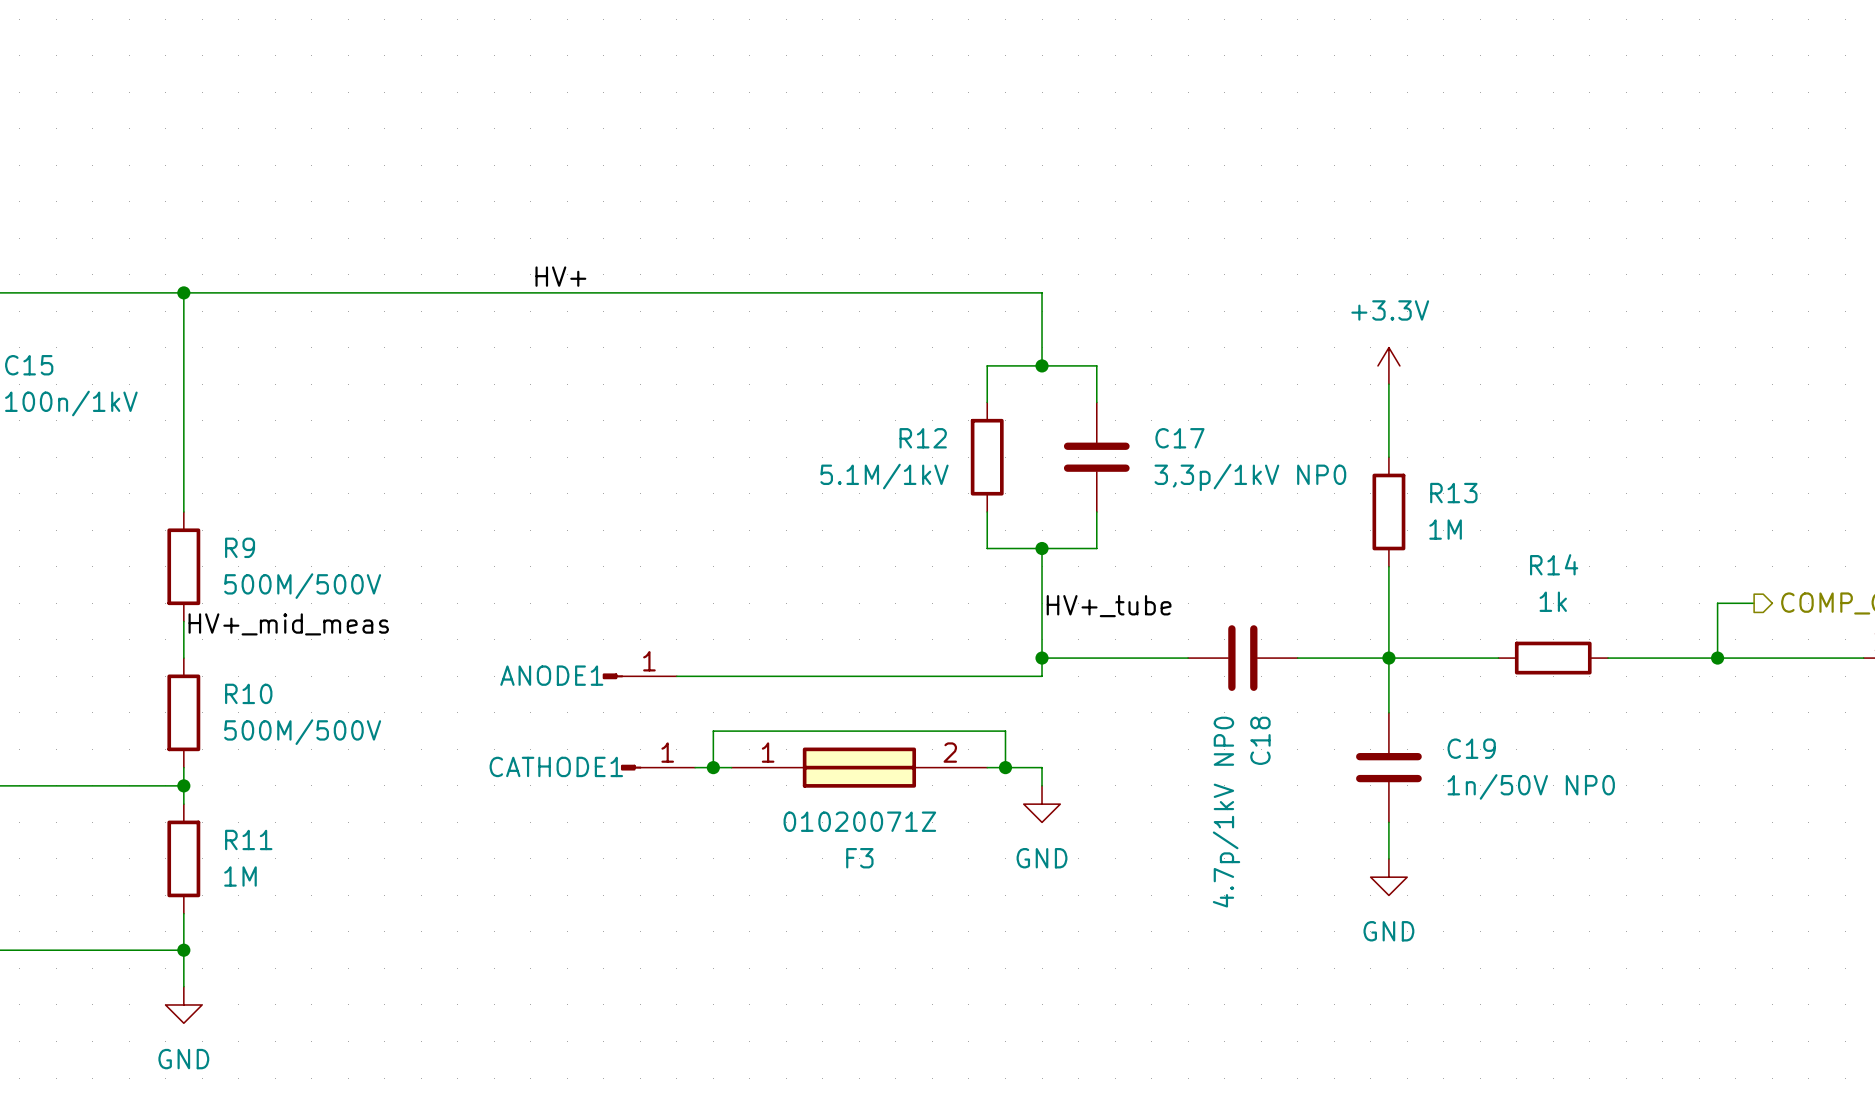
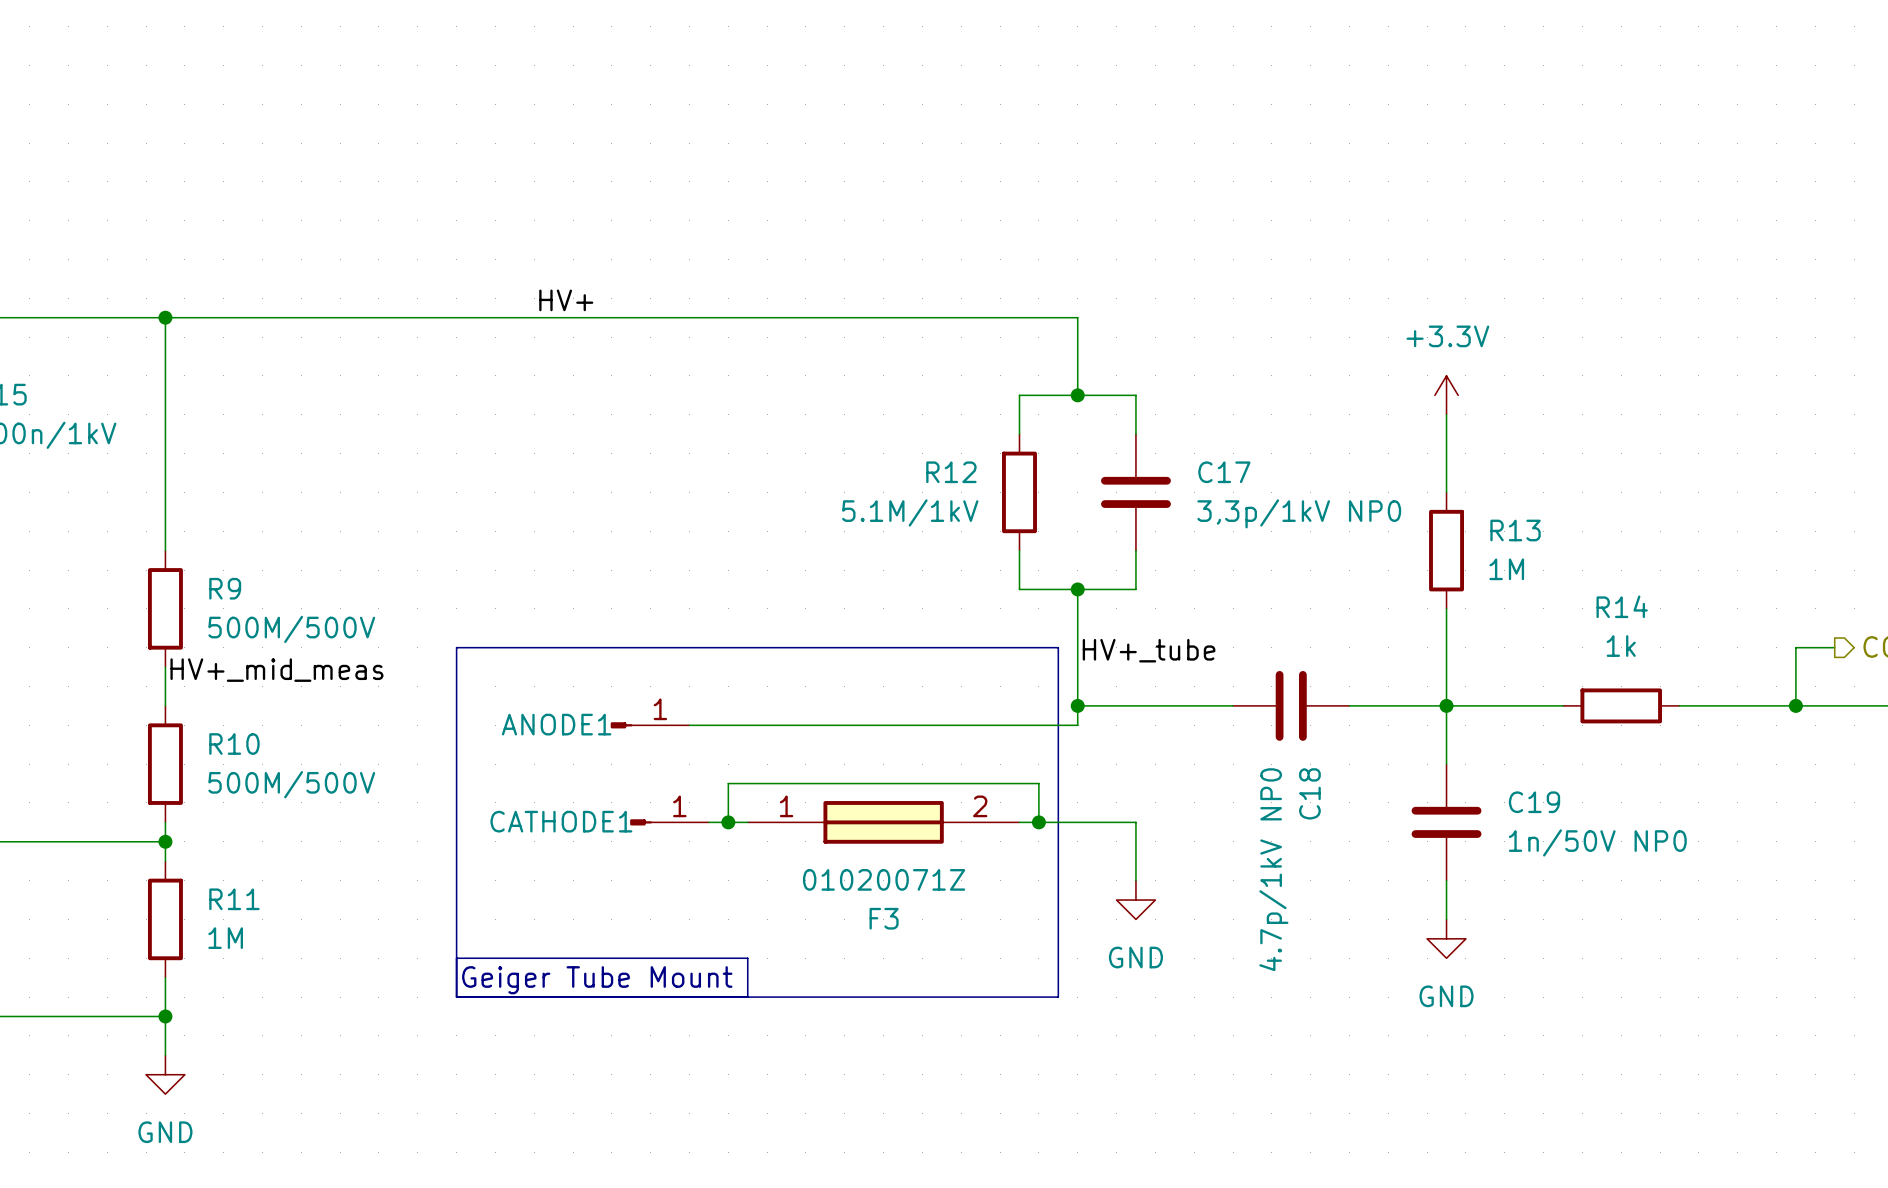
line: none -> (456, 647) (456, 997) (1058, 997) (1058, 647) (456, 647)
wire: (1042, 767) (1042, 785) -> (1077, 822) (1135, 822) (1135, 880)
power symbol position: GND (1042, 804) -> GND (1135, 900)
line: none -> (456, 958) (747, 958) (747, 997)
text: none -> Geiger Tube Mount (597, 980)

